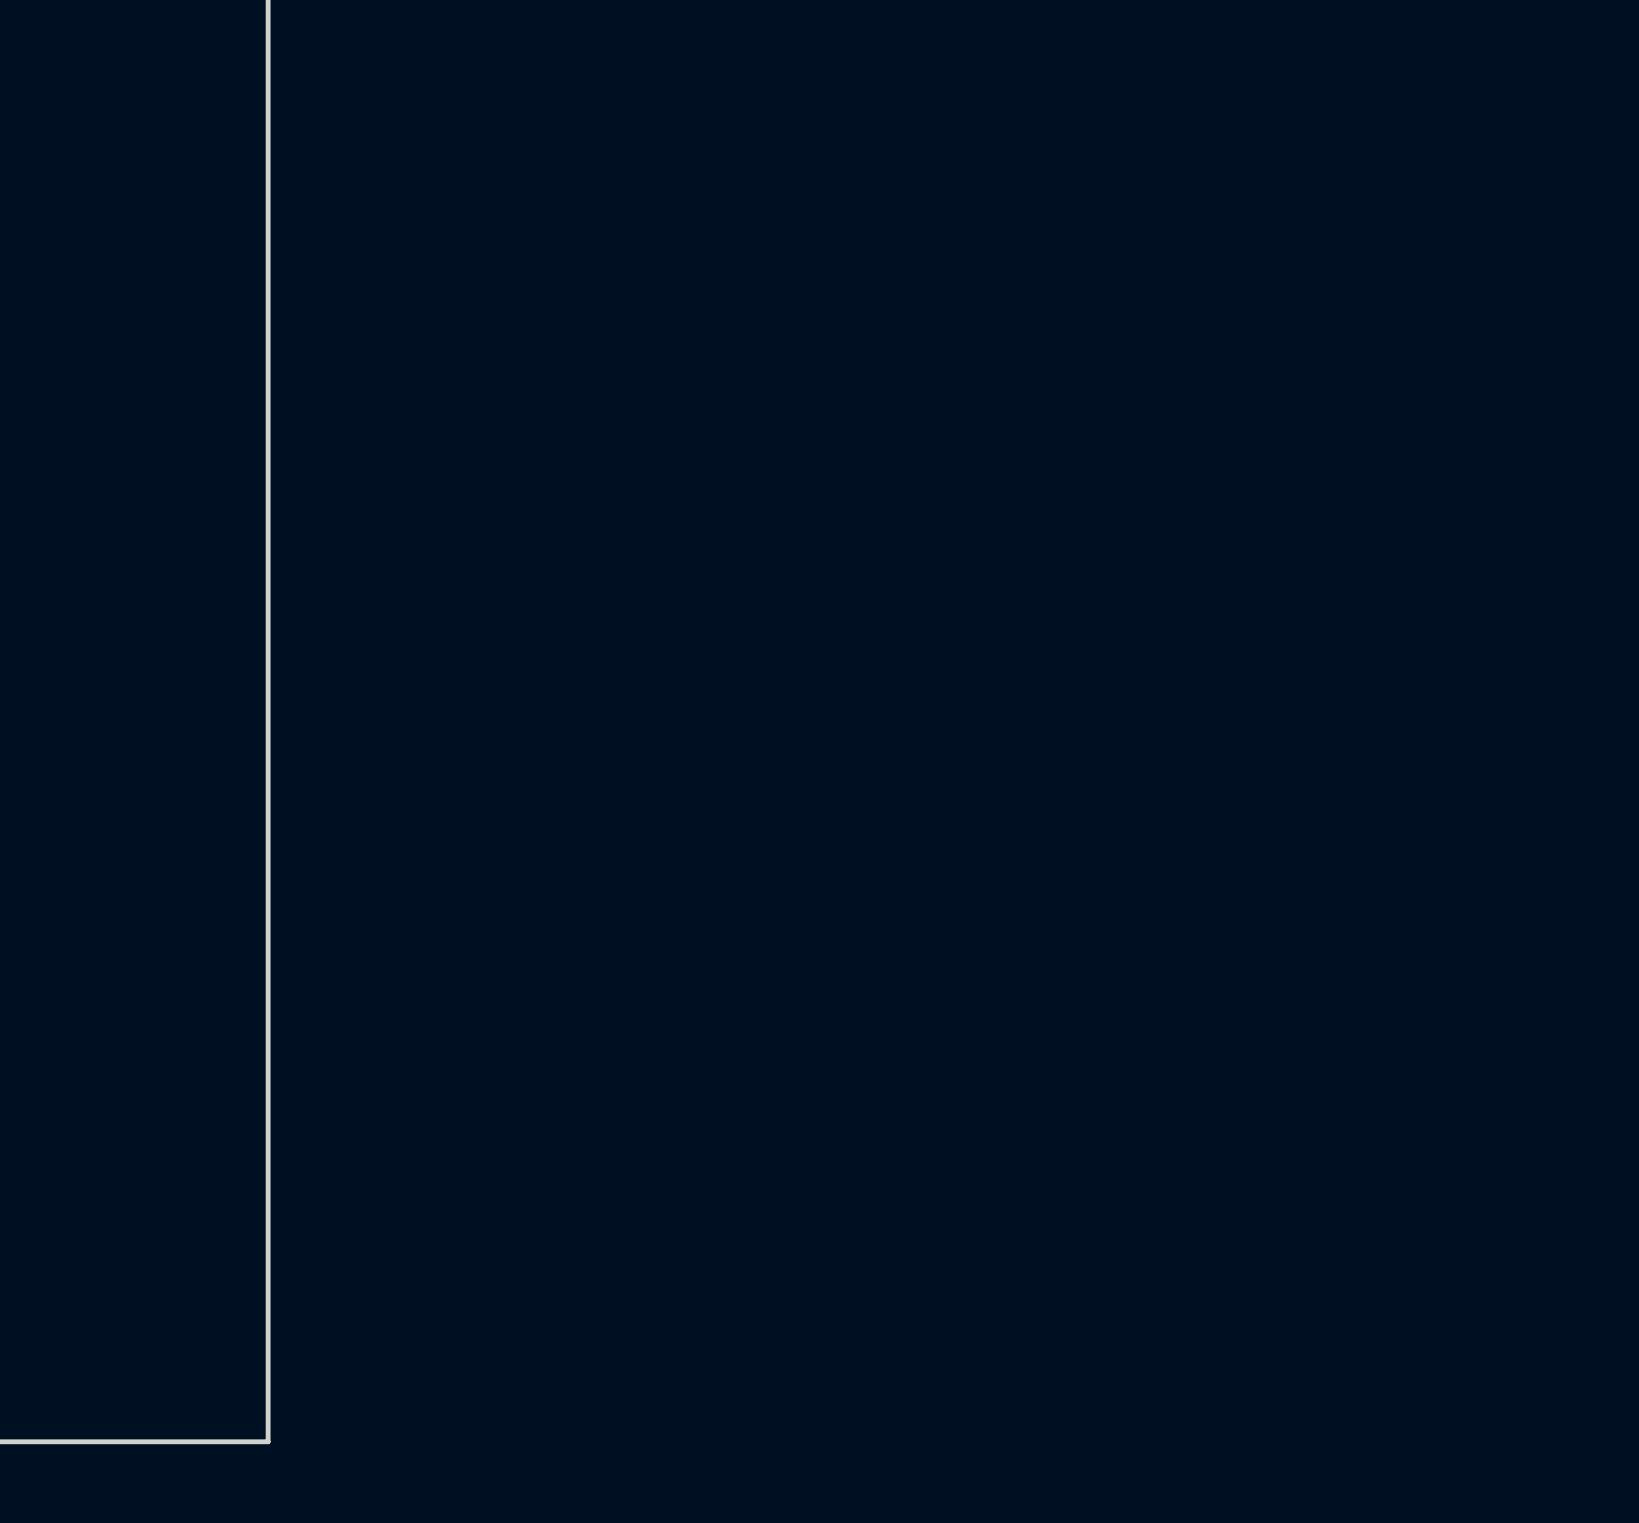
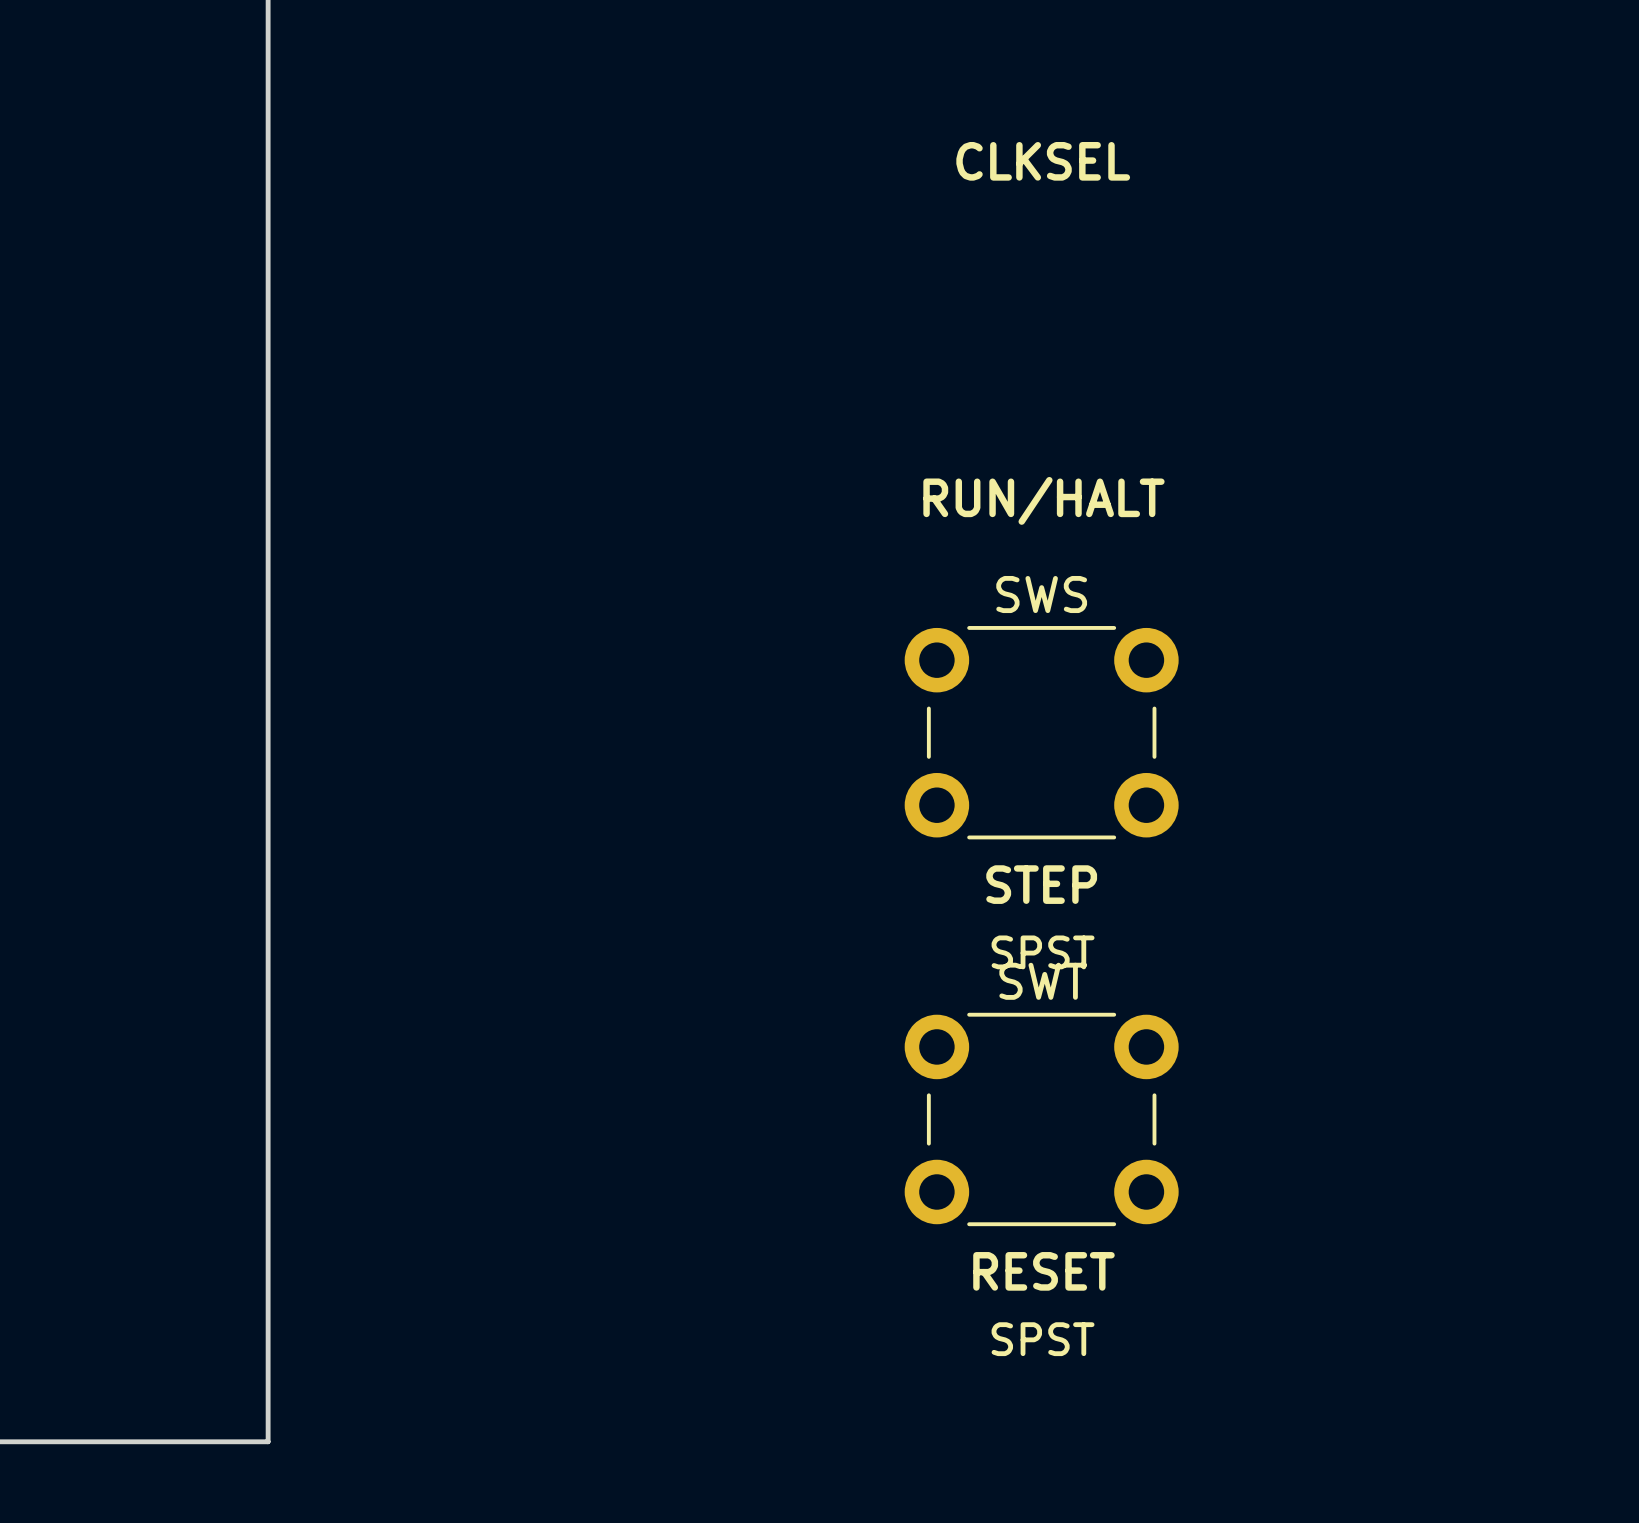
text: none -> CLKSEL (1043, 161)
text: none -> RUN/HALT (1043, 500)
SWS: none -> SPST (1041, 732)
text: none -> STEP (1041, 884)
SWT: none -> SPST (1041, 1119)
text: none -> RESET (1043, 1271)

